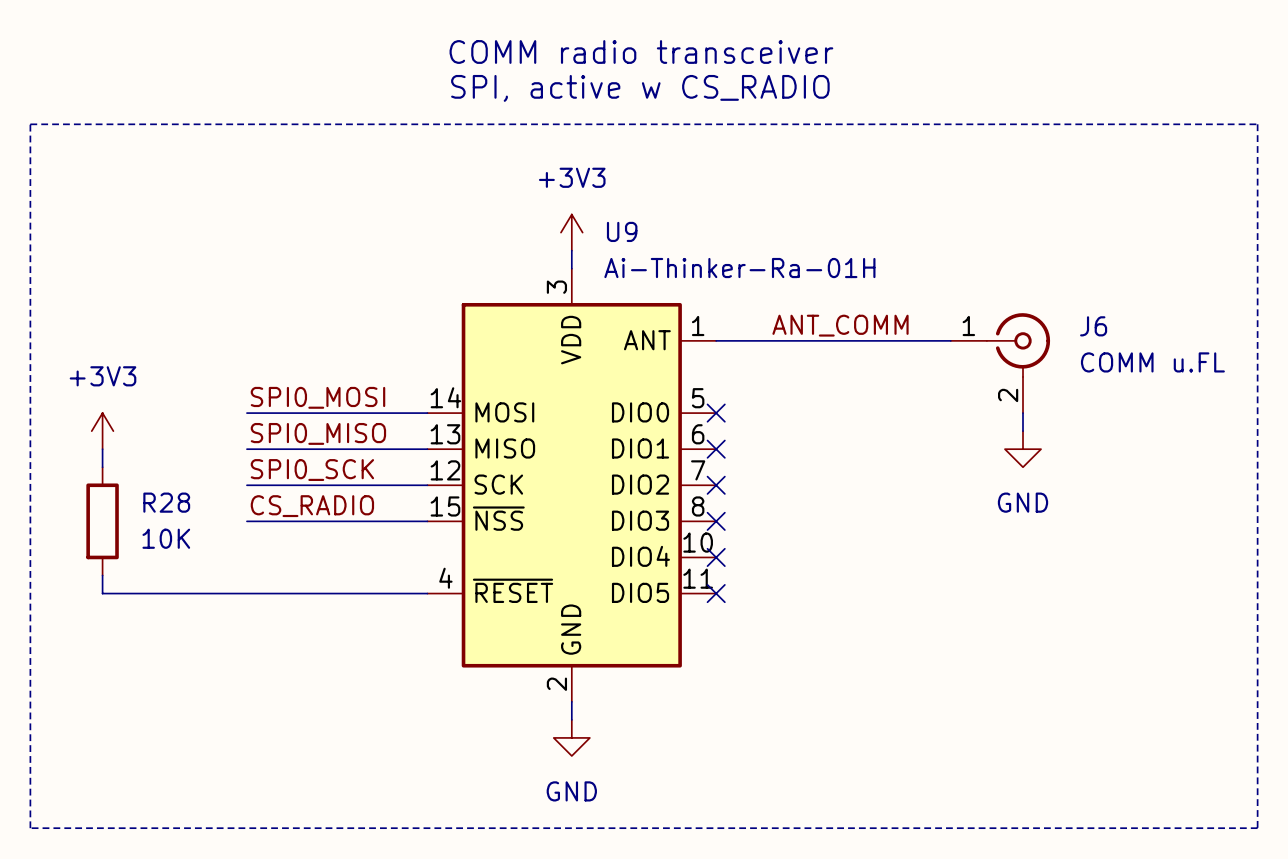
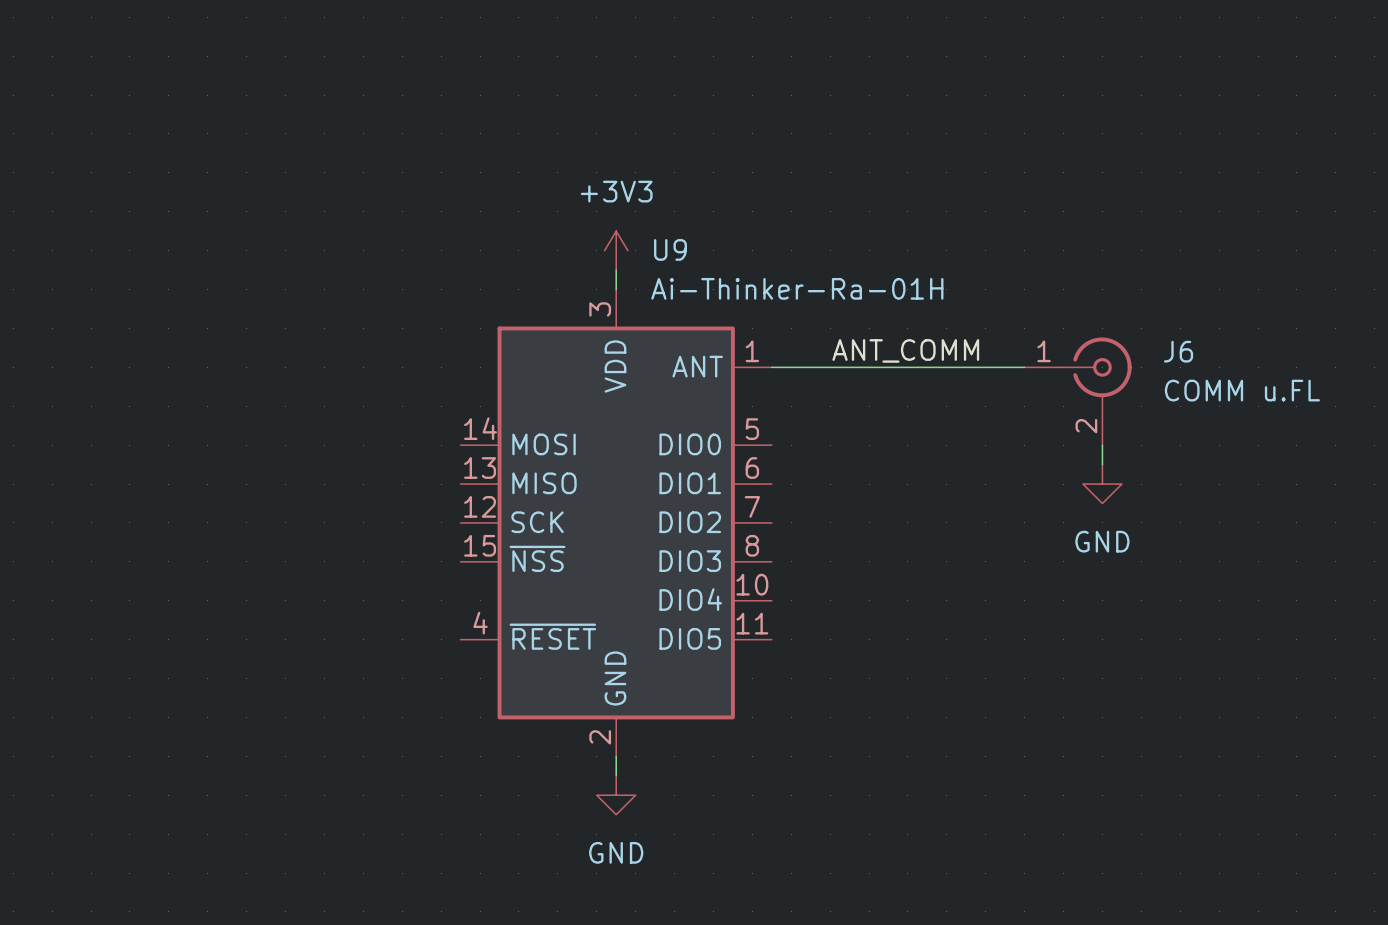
text: COMM radio transceiver (641, 51) -> none
text: SPI, active w CS_RADIO (640, 88) -> none
line: (30, 124) (1257, 124) (1257, 828) (30, 828) (30, 124) -> none
label: SPI0_MOSI (317, 397) -> none
wire: (246, 413) (427, 413) -> none
no-connect mark: (716, 413) -> none
power symbol: +3V3 (102, 431) -> none
label: SPI0_MISO (318, 433) -> none
wire: (102, 449) (102, 467) -> none
wire: (246, 449) (427, 449) -> none
no-connect mark: (716, 449) -> none
label: SPI0_SCK (312, 470) -> none
wire: (246, 485) (427, 485) -> none
no-connect mark: (716, 485) -> none
label: CS_RADIO (312, 506) -> none
R28: 10K (102, 521) -> none
wire: (246, 521) (427, 521) -> none
no-connect mark: (716, 521) -> none
no-connect mark: (716, 557) -> none
wire: (102, 575) (102, 593) (427, 593) -> none
no-connect mark: (716, 593) -> none

